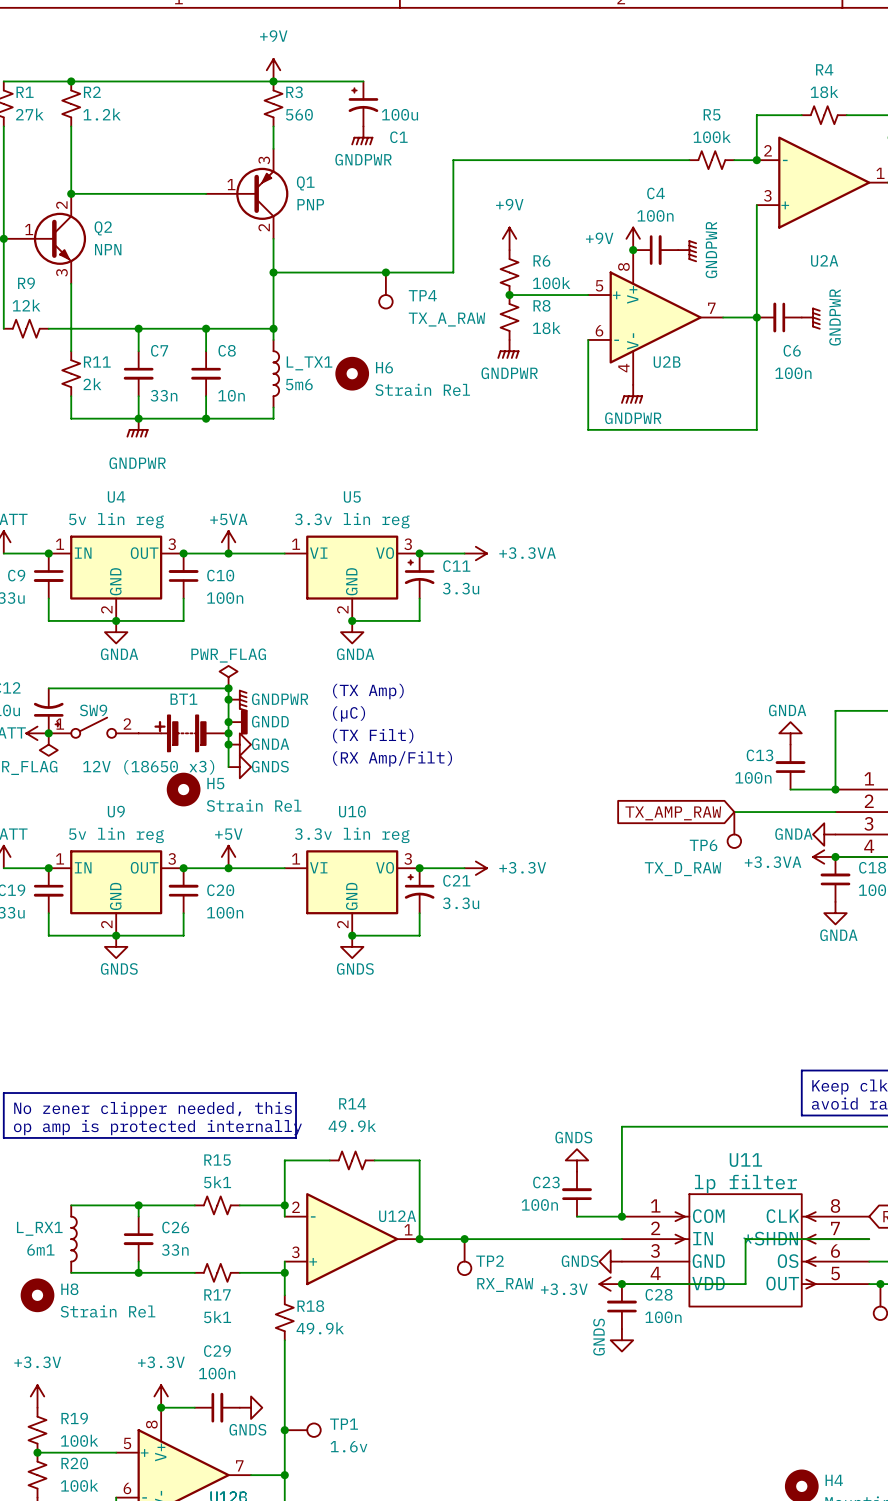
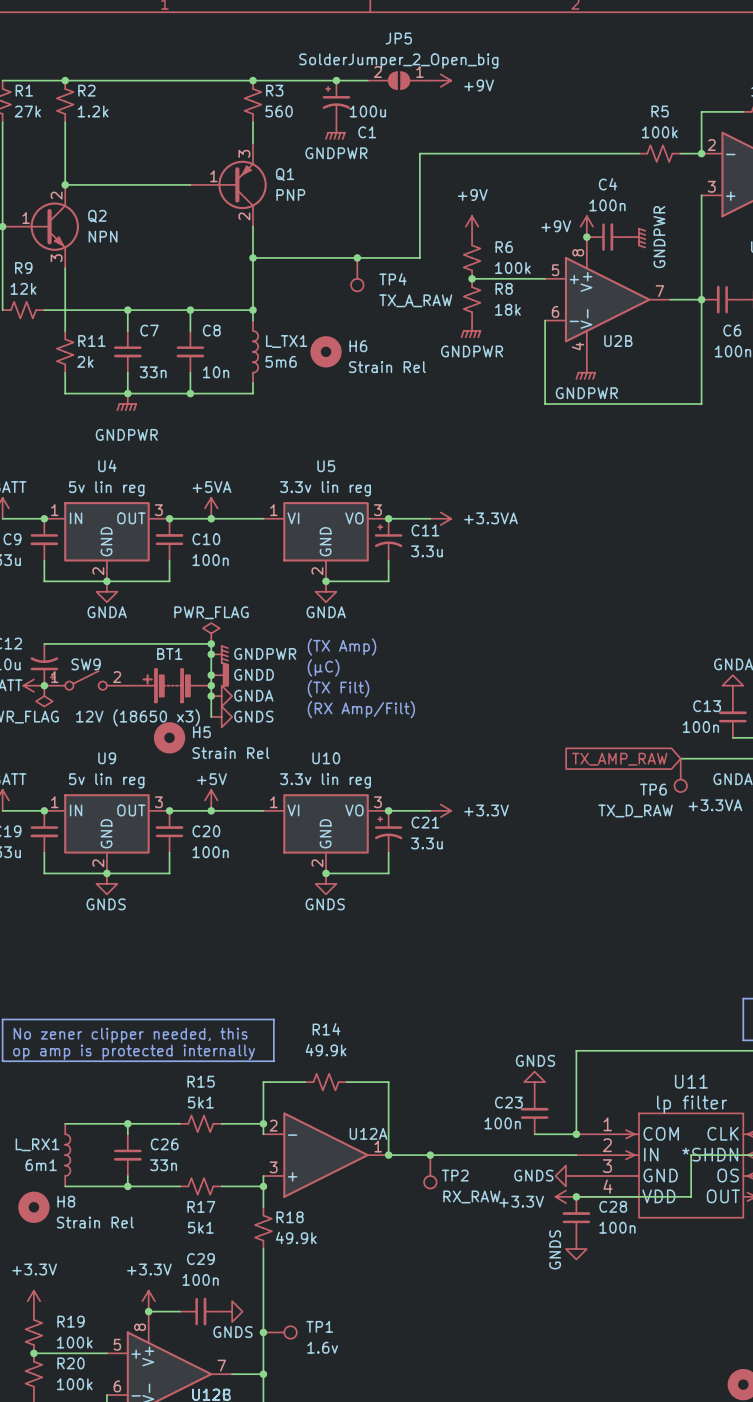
power symbol rotation: 0° (273, 70) -> 90° clockwise (440, 80)
power symbol position: +9V (273, 70) -> +9V (440, 80)
wire: none -> (336, 80) (367, 80)
junction: none -> (336, 80)
JP5: none -> SolderJumper_2_Open_big (399, 80)

